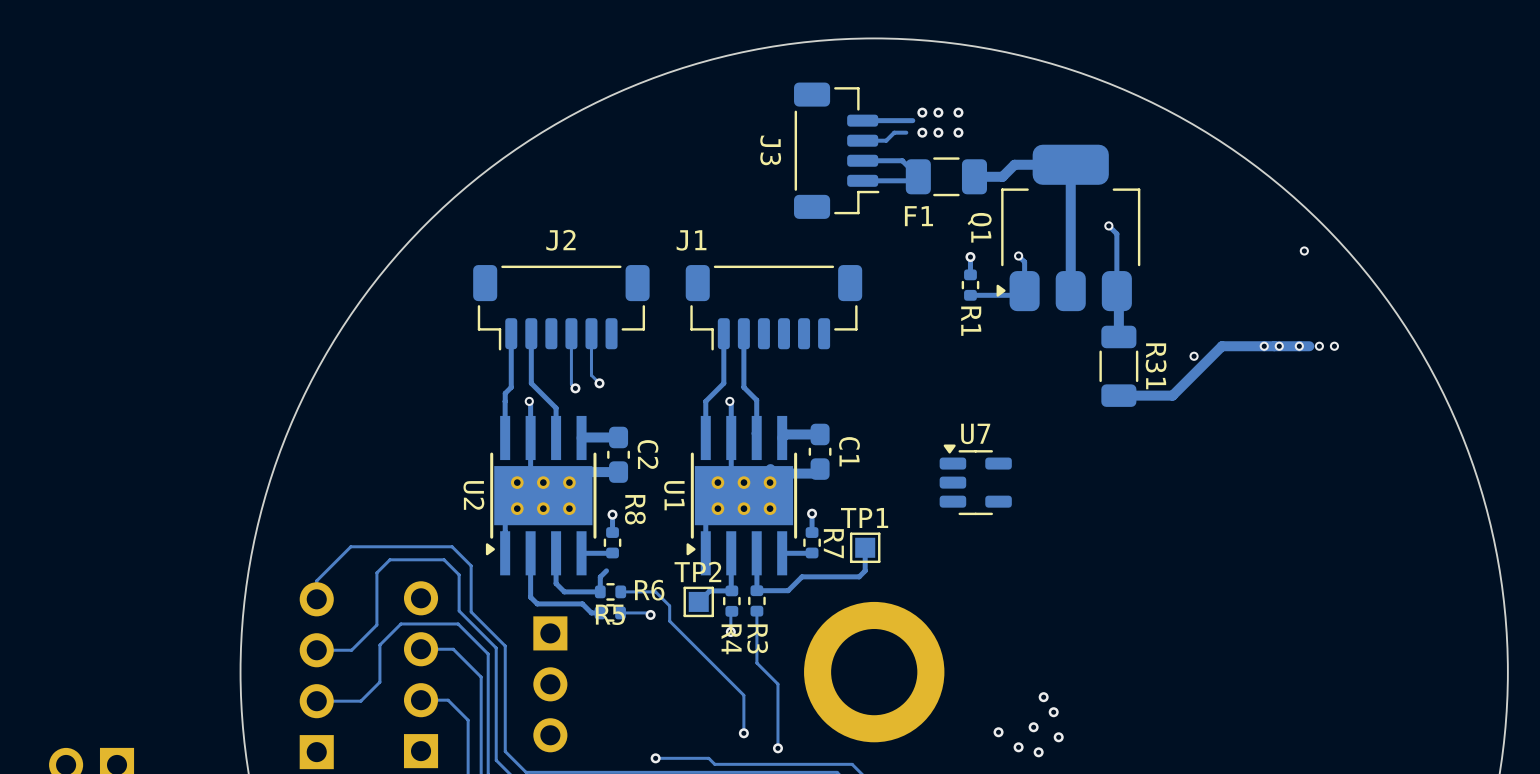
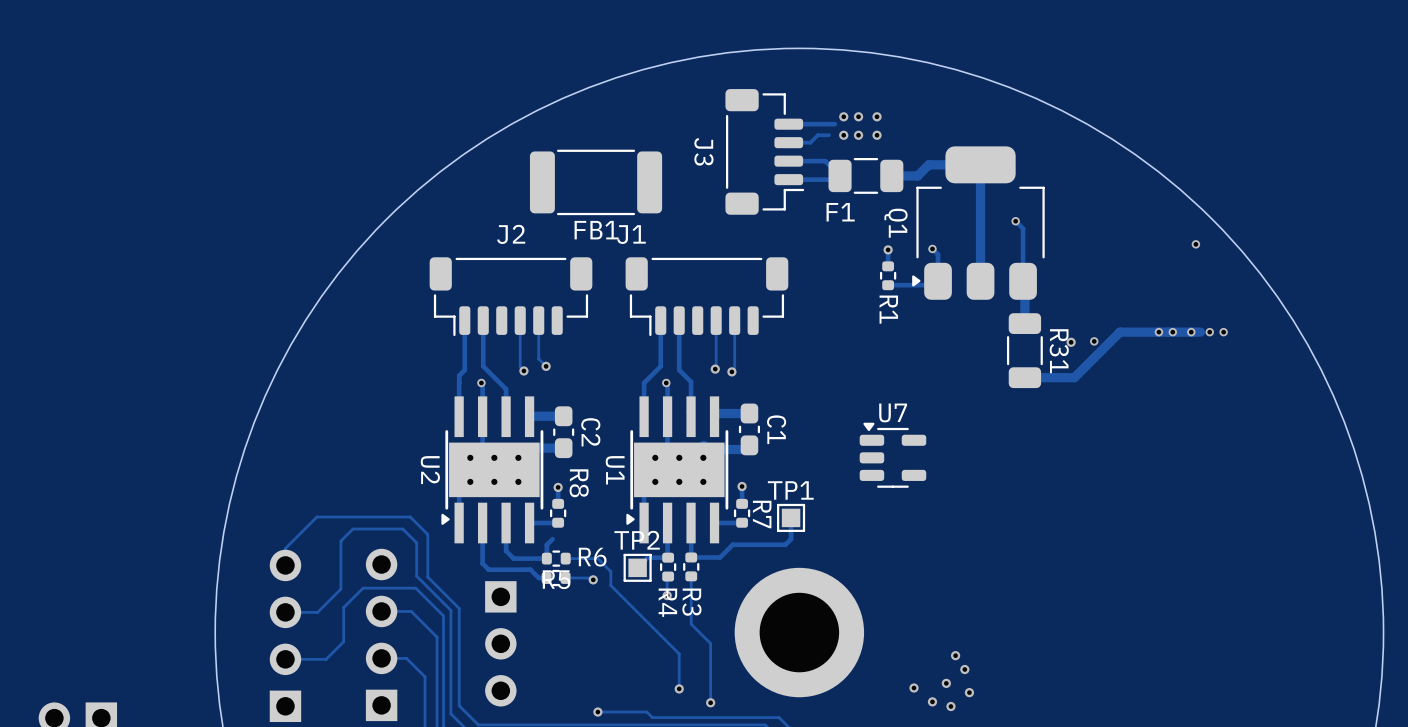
FB1: none -> (596, 182)
track: none -> (716, 320) (715, 369)
track: none -> (734, 320) (734, 369) (731, 371)
via: none -> (1071, 342)
via: none -> (715, 369)
via: none -> (731, 371)

